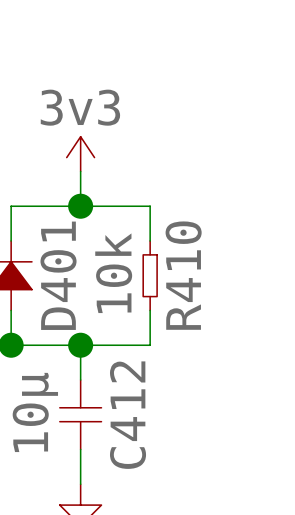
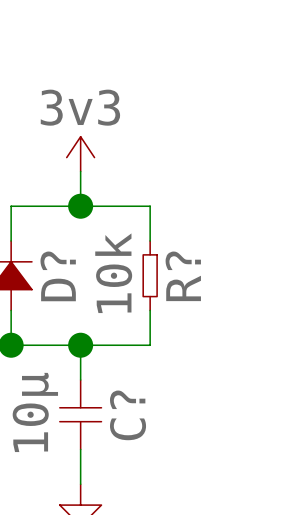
D401 name: D401 (58, 275) -> D? (58, 276)
R410 name: R410 (183, 275) -> R? (183, 276)
C412 name: C412 (128, 415) -> C? (128, 415)

